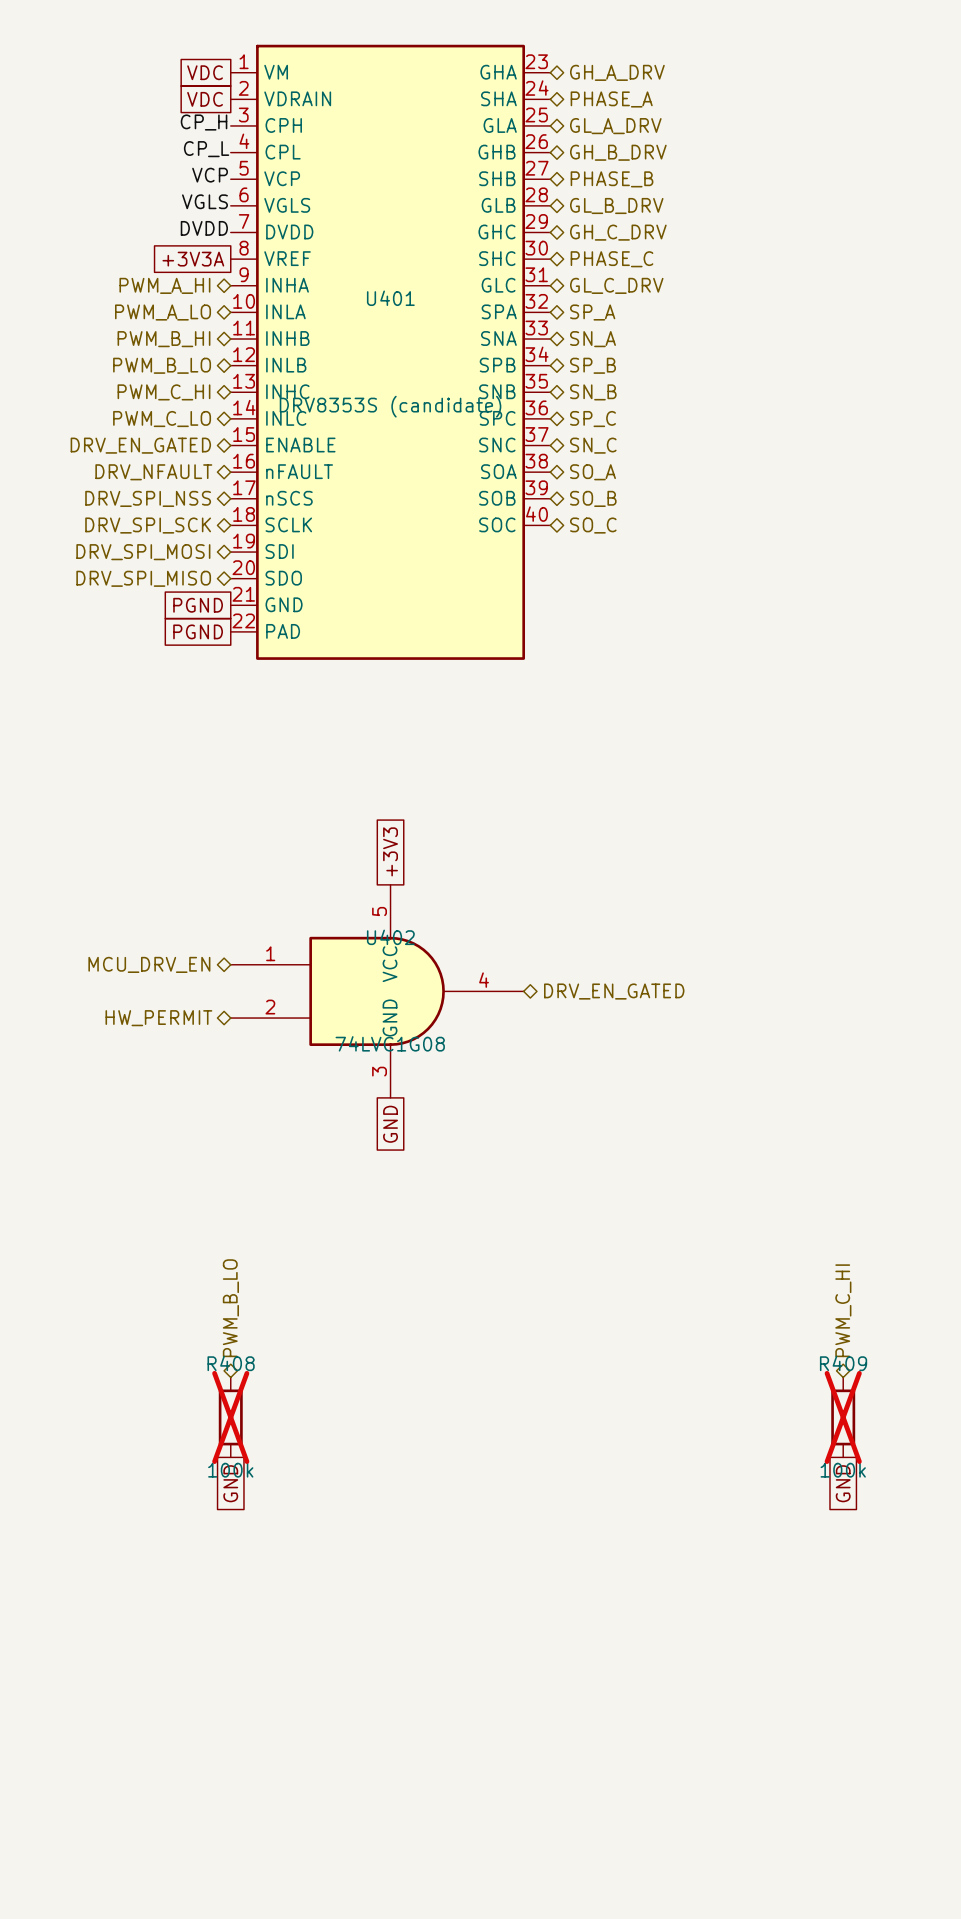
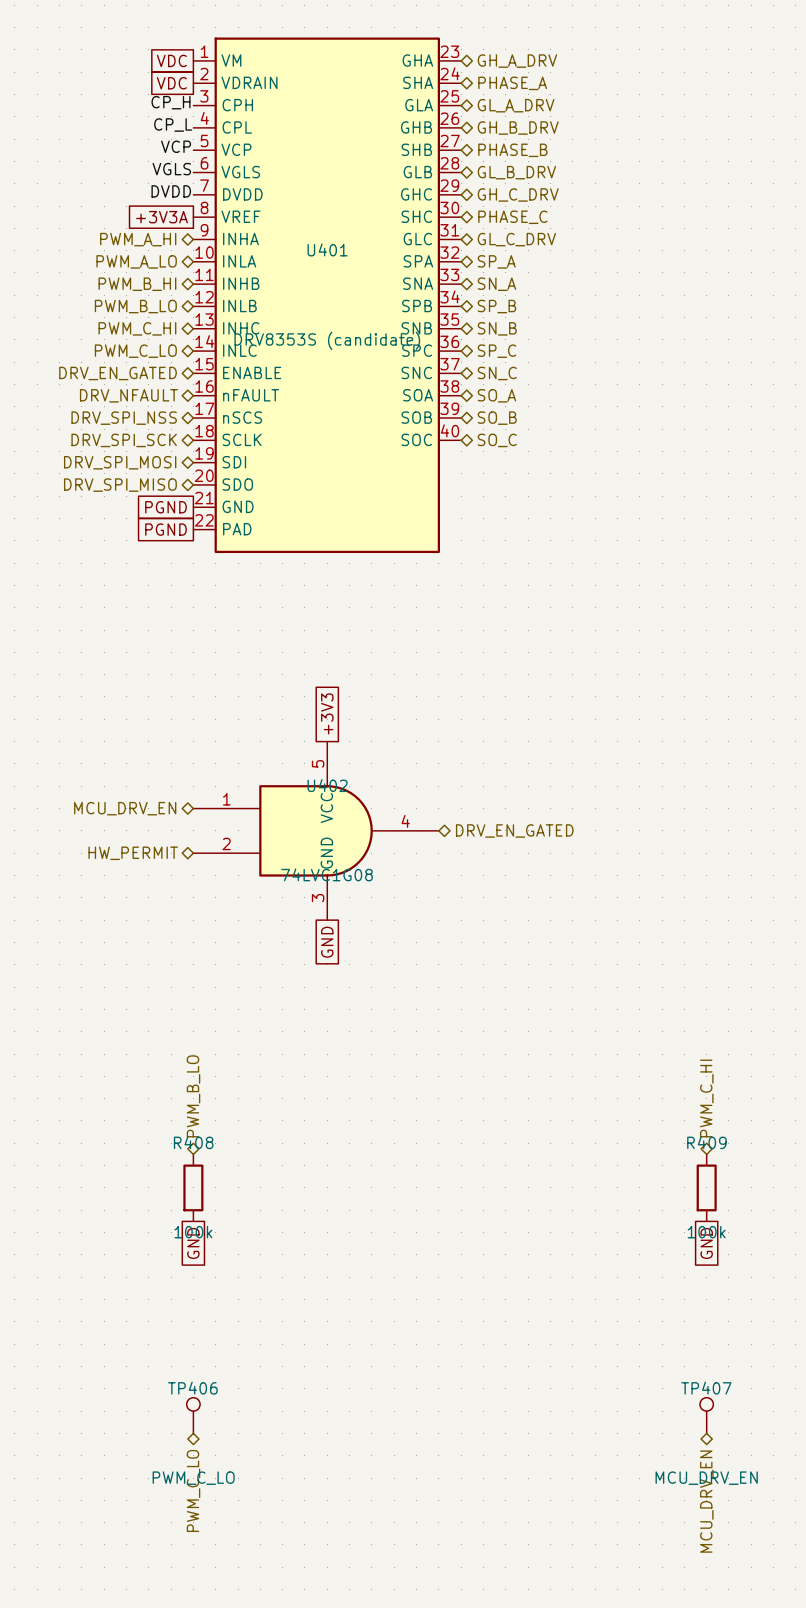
R408 do-not-place cross: (230, 1417) -> none
R409 do-not-place cross: (843, 1417) -> none
TP406: none -> PWM_C_LO (193, 1415)
TP407: none -> MCU_DRV_EN (706, 1415)
hierarchical label: none -> PWM_C_LO (193, 1490)
hierarchical label: none -> MCU_DRV_EN (706, 1501)

